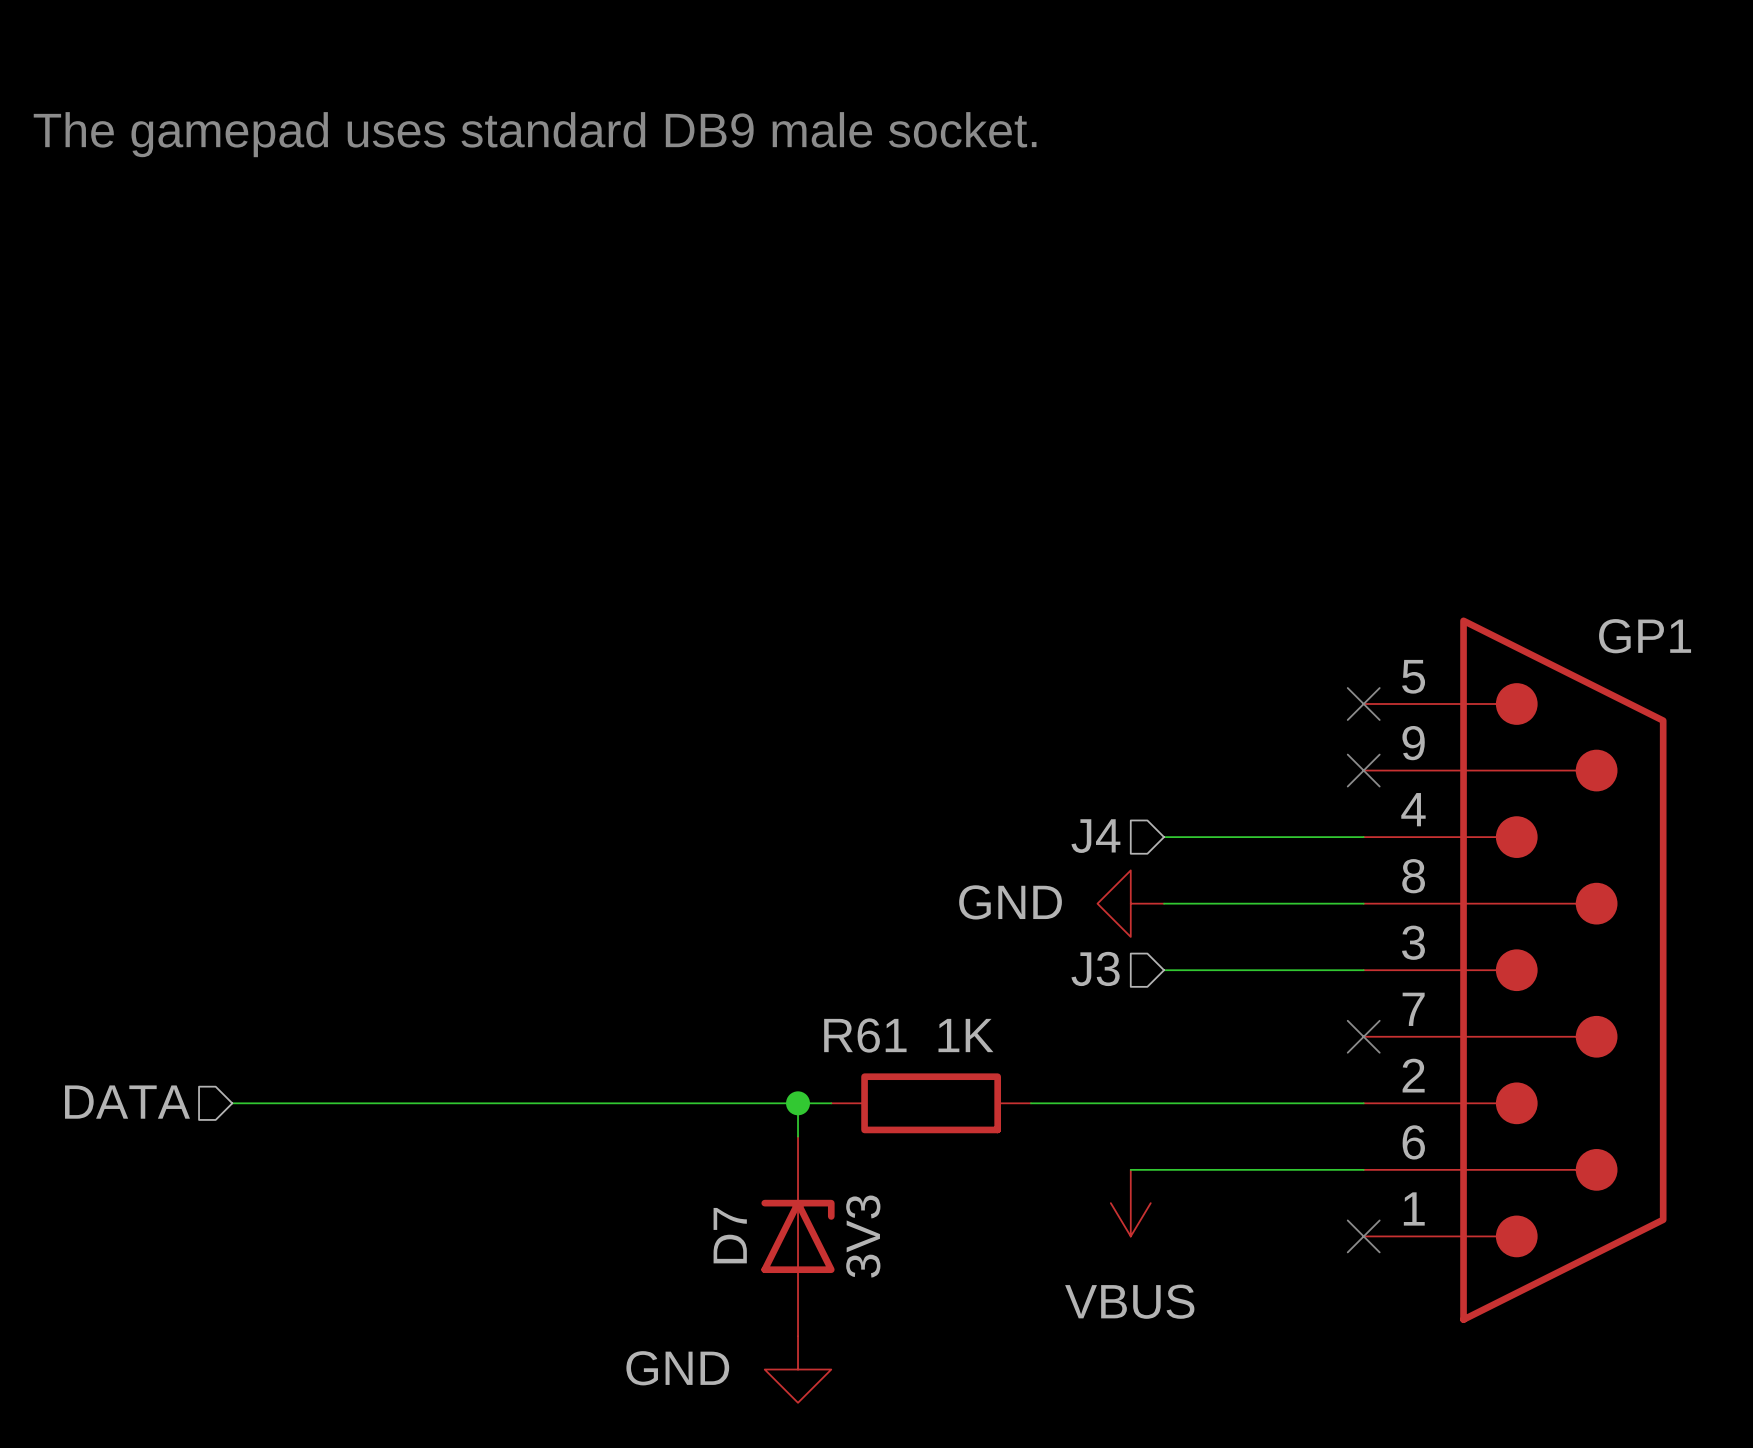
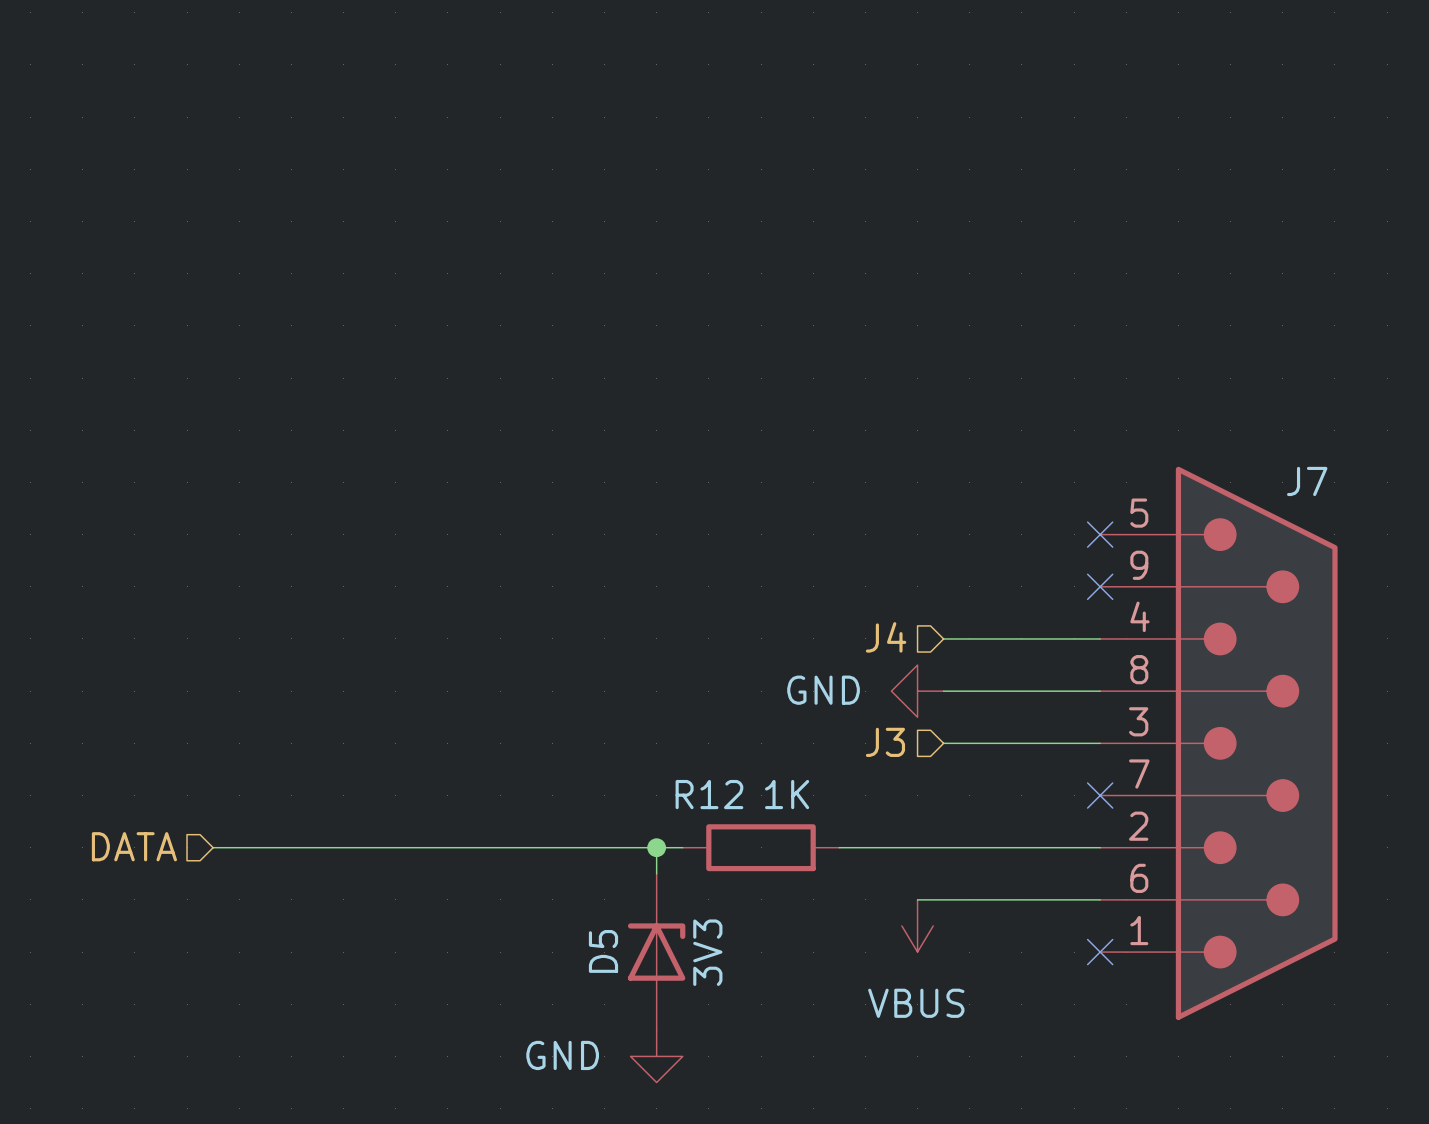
text: The gamepad uses standard DB9 male socket. (535, 134) -> none
GP1 name: GP1 (1645, 636) -> J7 (1307, 481)
R61 name: R61 (865, 1035) -> R12 (709, 794)
D7 name: D7 (730, 1235) -> D5 (603, 951)

